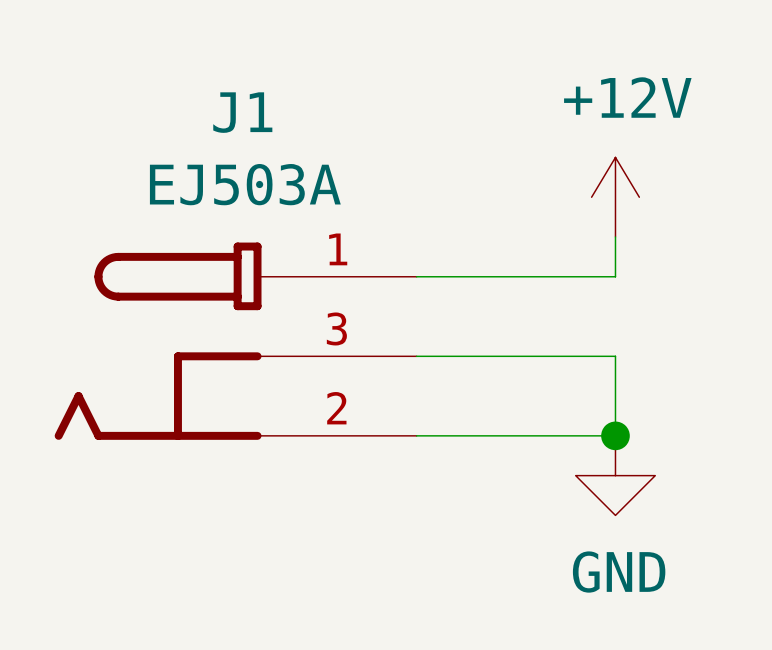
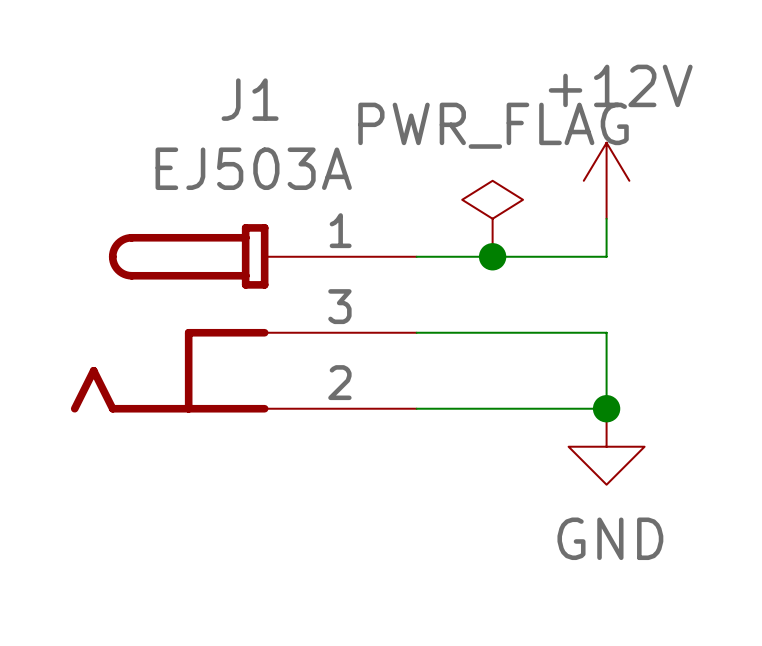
power symbol: none -> PWR_FLAG (492, 218)
junction: none -> (492, 256)

